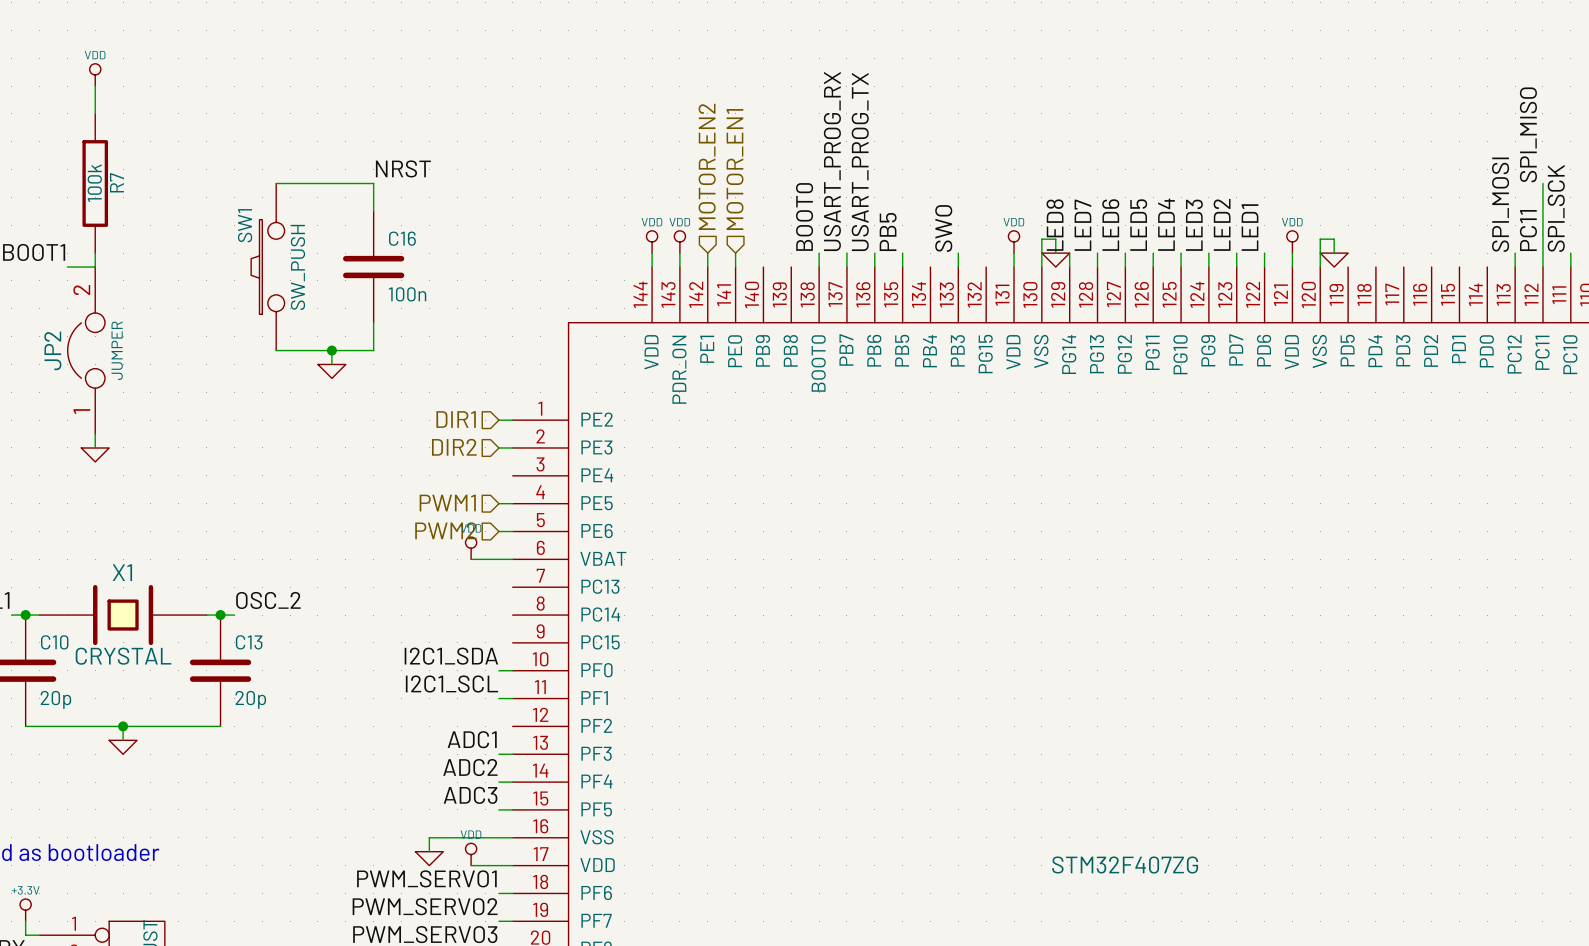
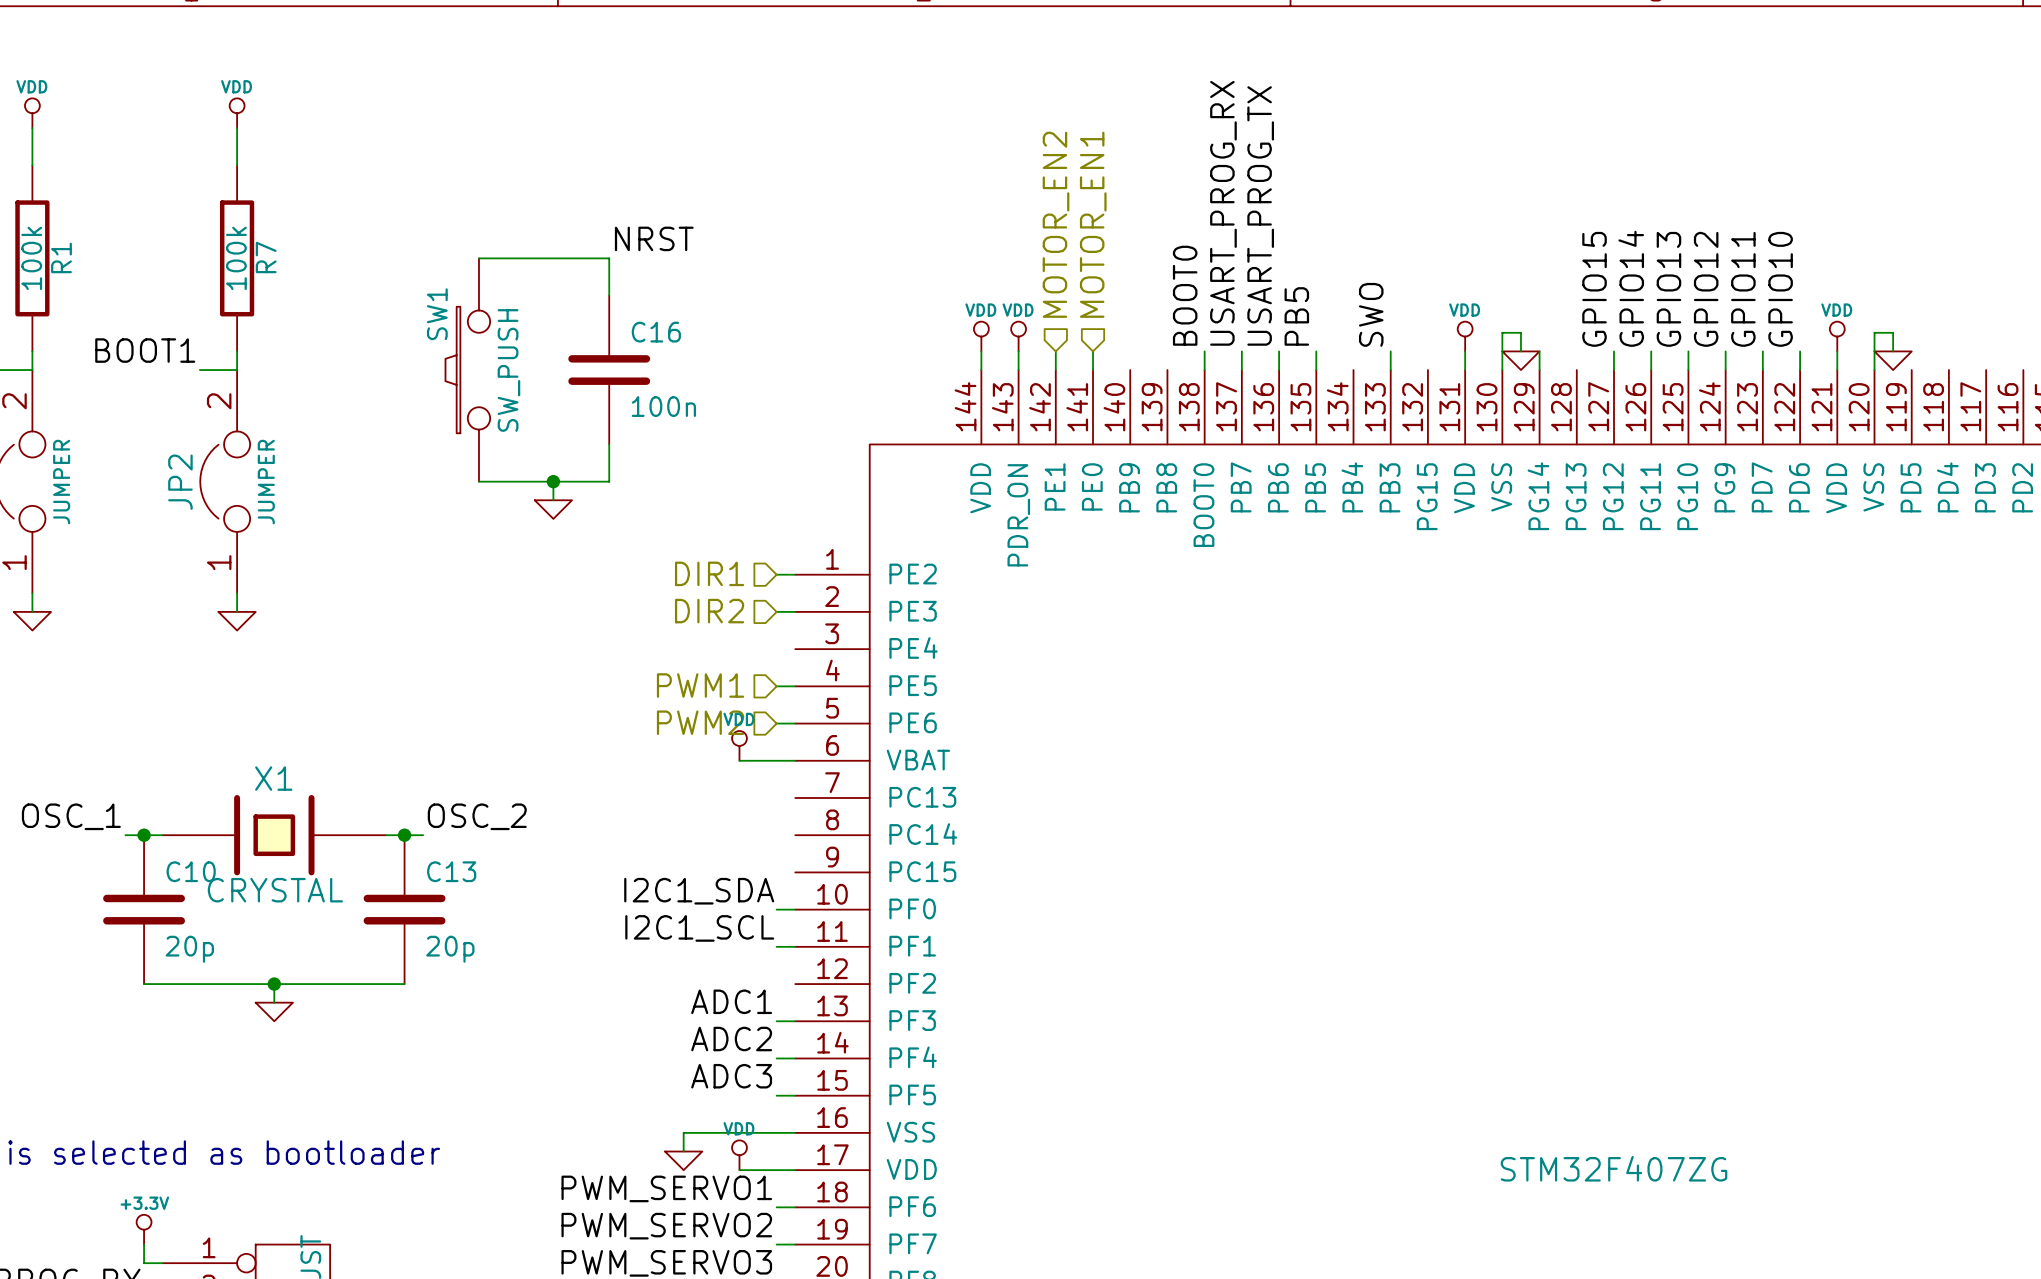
label: LED4 (1166, 224) -> GPIO13 (1668, 289)
label: LED2 (1222, 224) -> GPIO11 (1743, 289)
label: LED8 (1055, 225) -> none
label: LED7 (1082, 225) -> none
label: LED6 (1110, 225) -> GPIO15 (1594, 289)
label: LED5 (1138, 225) -> GPIO14 (1631, 288)
label: LED3 (1194, 225) -> GPIO12 (1706, 289)
label: LED1 (1250, 227) -> GPIO10 (1780, 289)
wire: (1097, 253) (1097, 267) -> none

